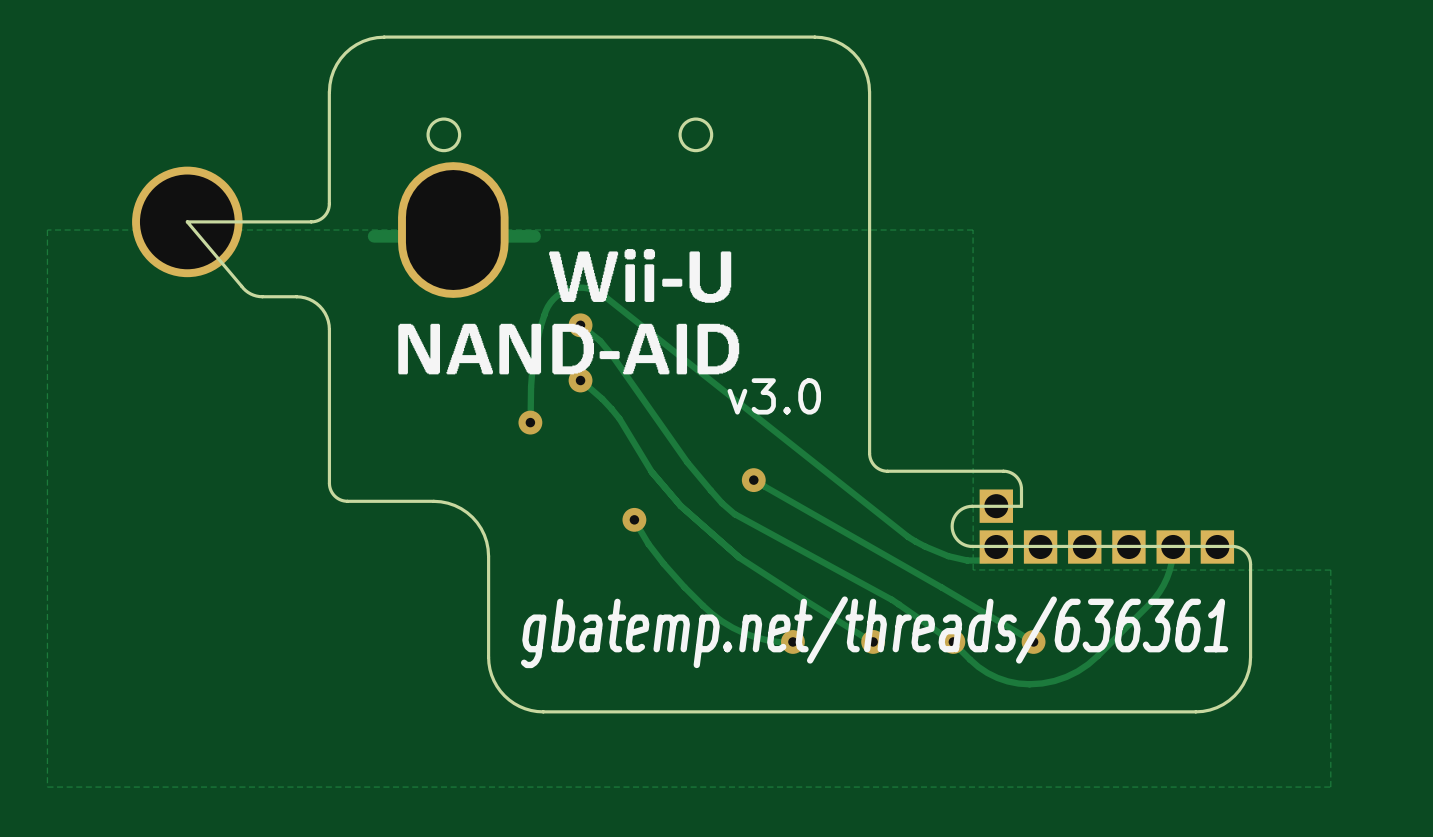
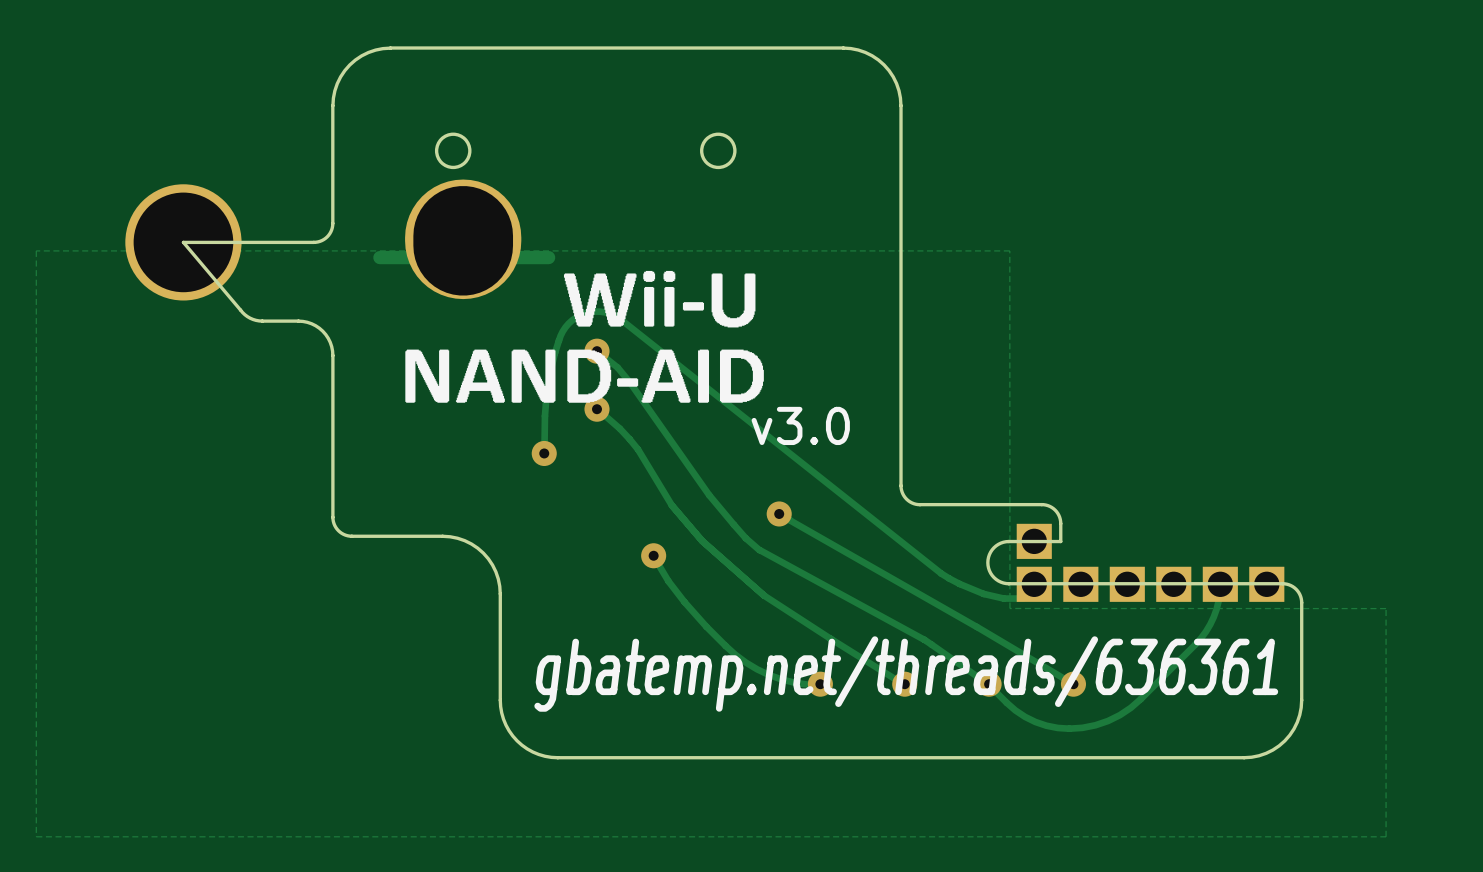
part footprint: [398, 162, 509, 298] -> [405, 179, 522, 300]

